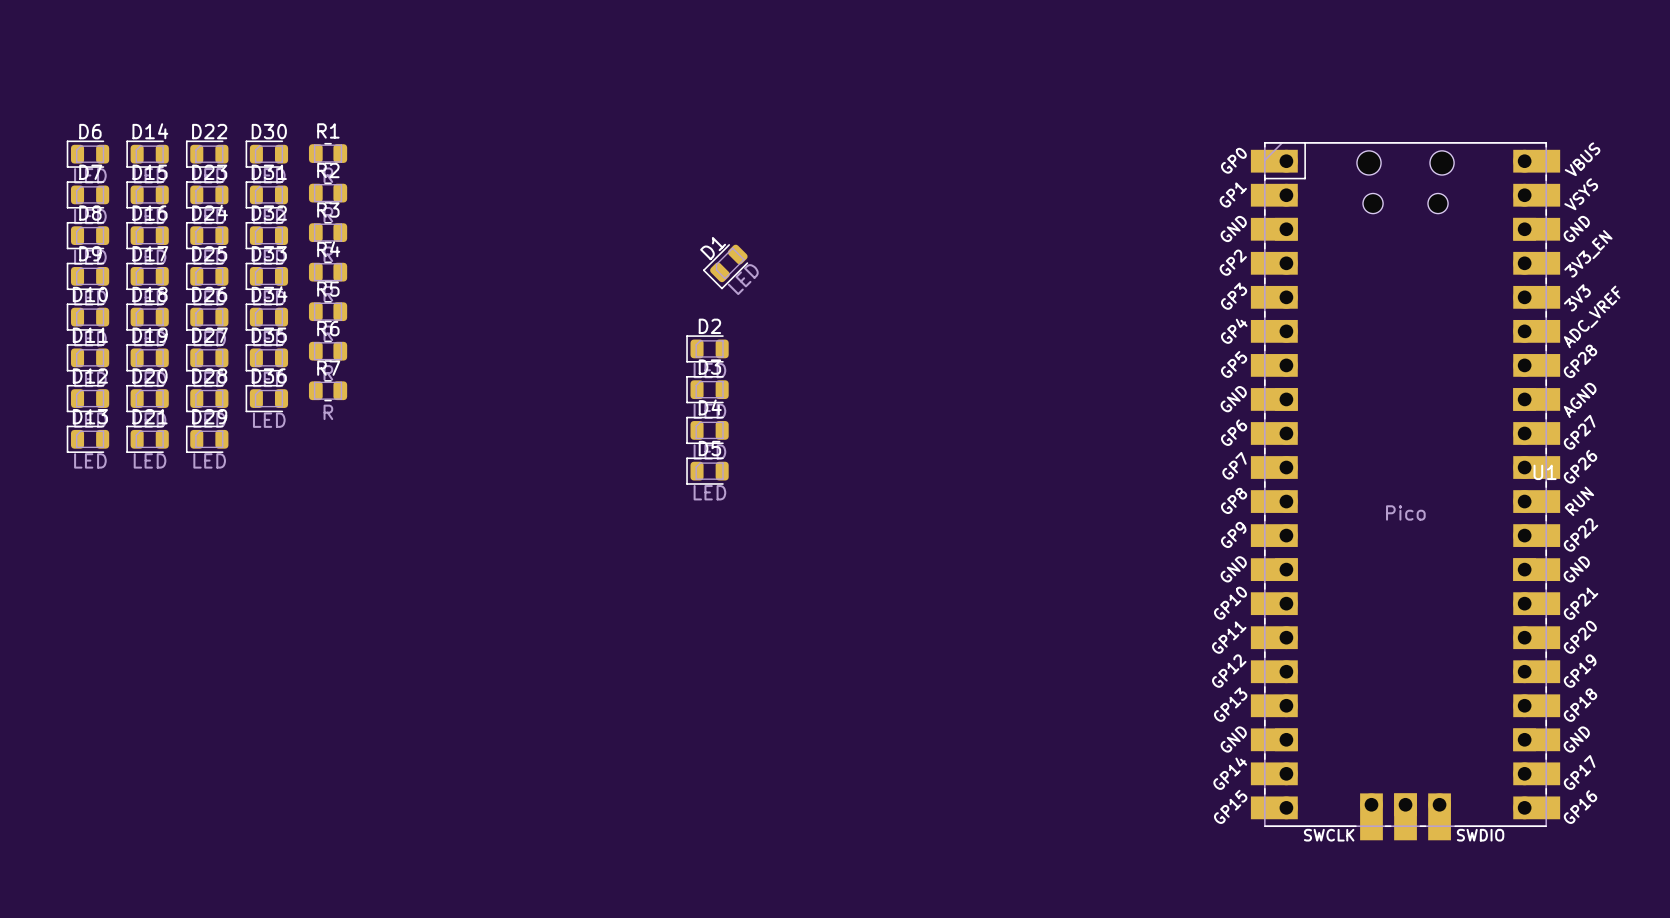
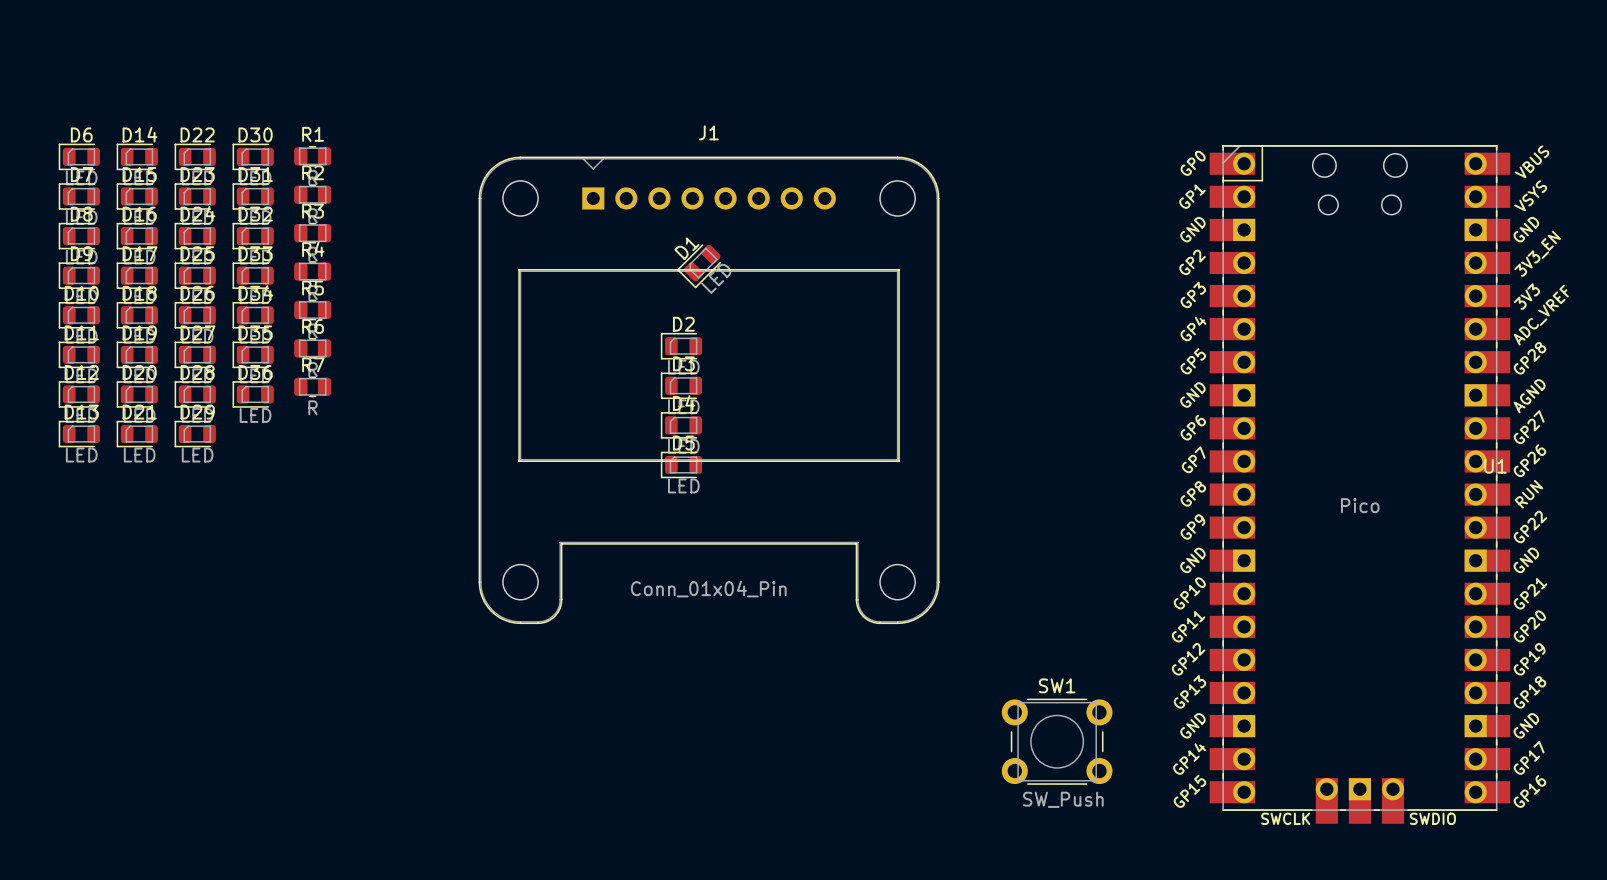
J1: none -> Conn_01x04_Pin (709, 390)
SW1: none -> SW_Push (1057, 741)

